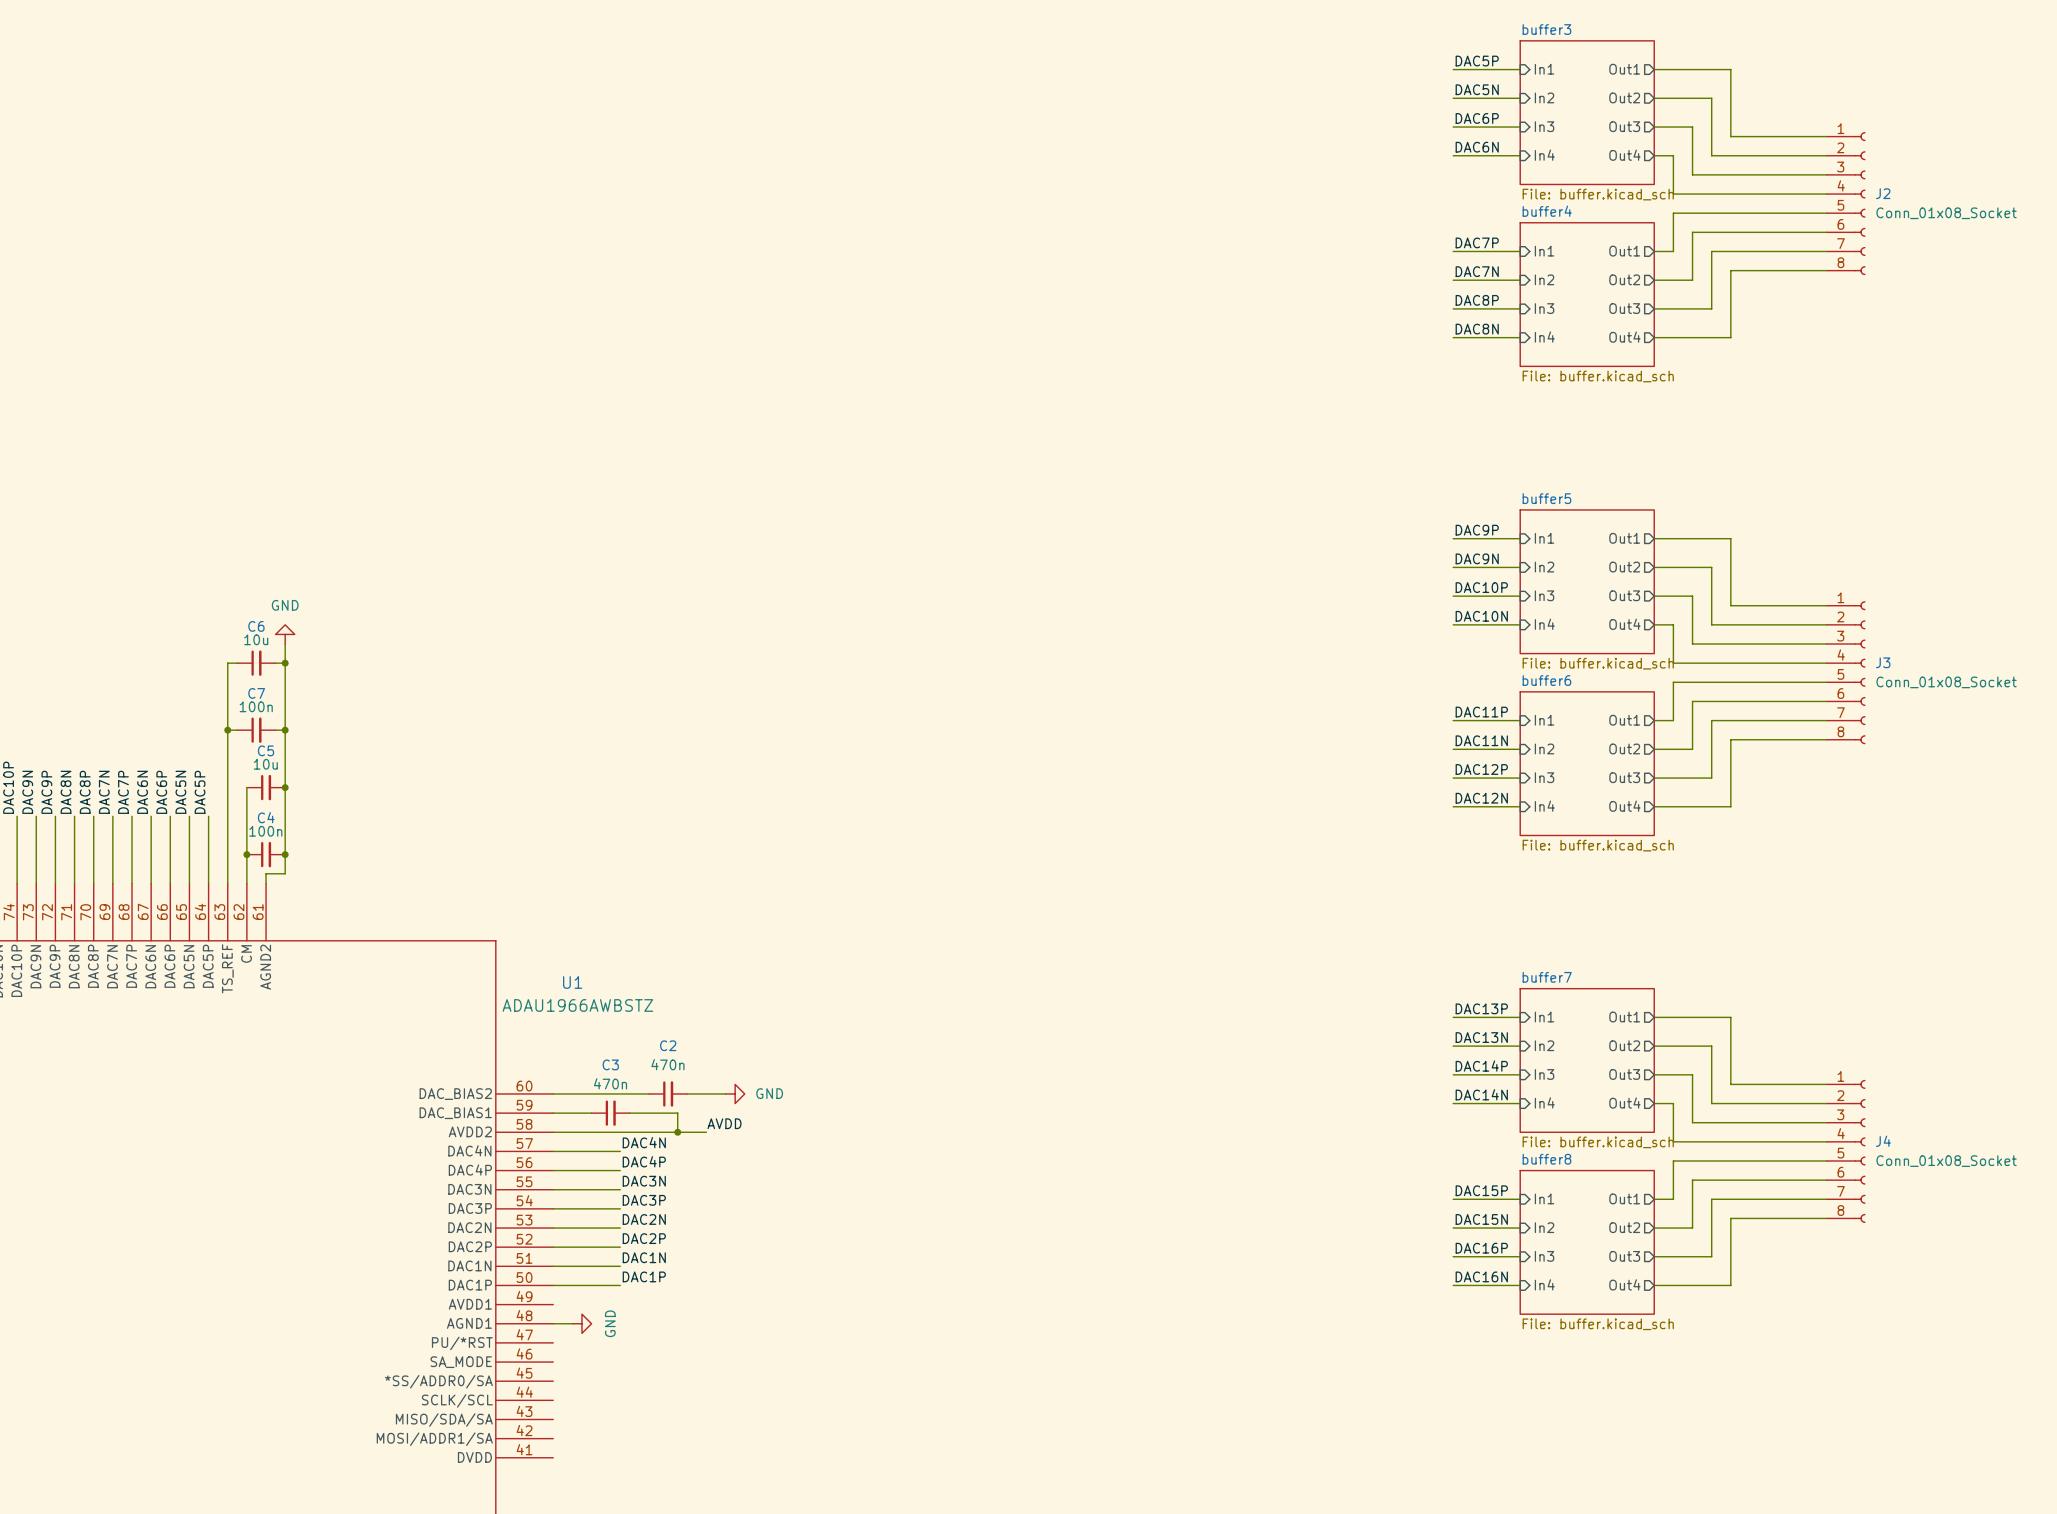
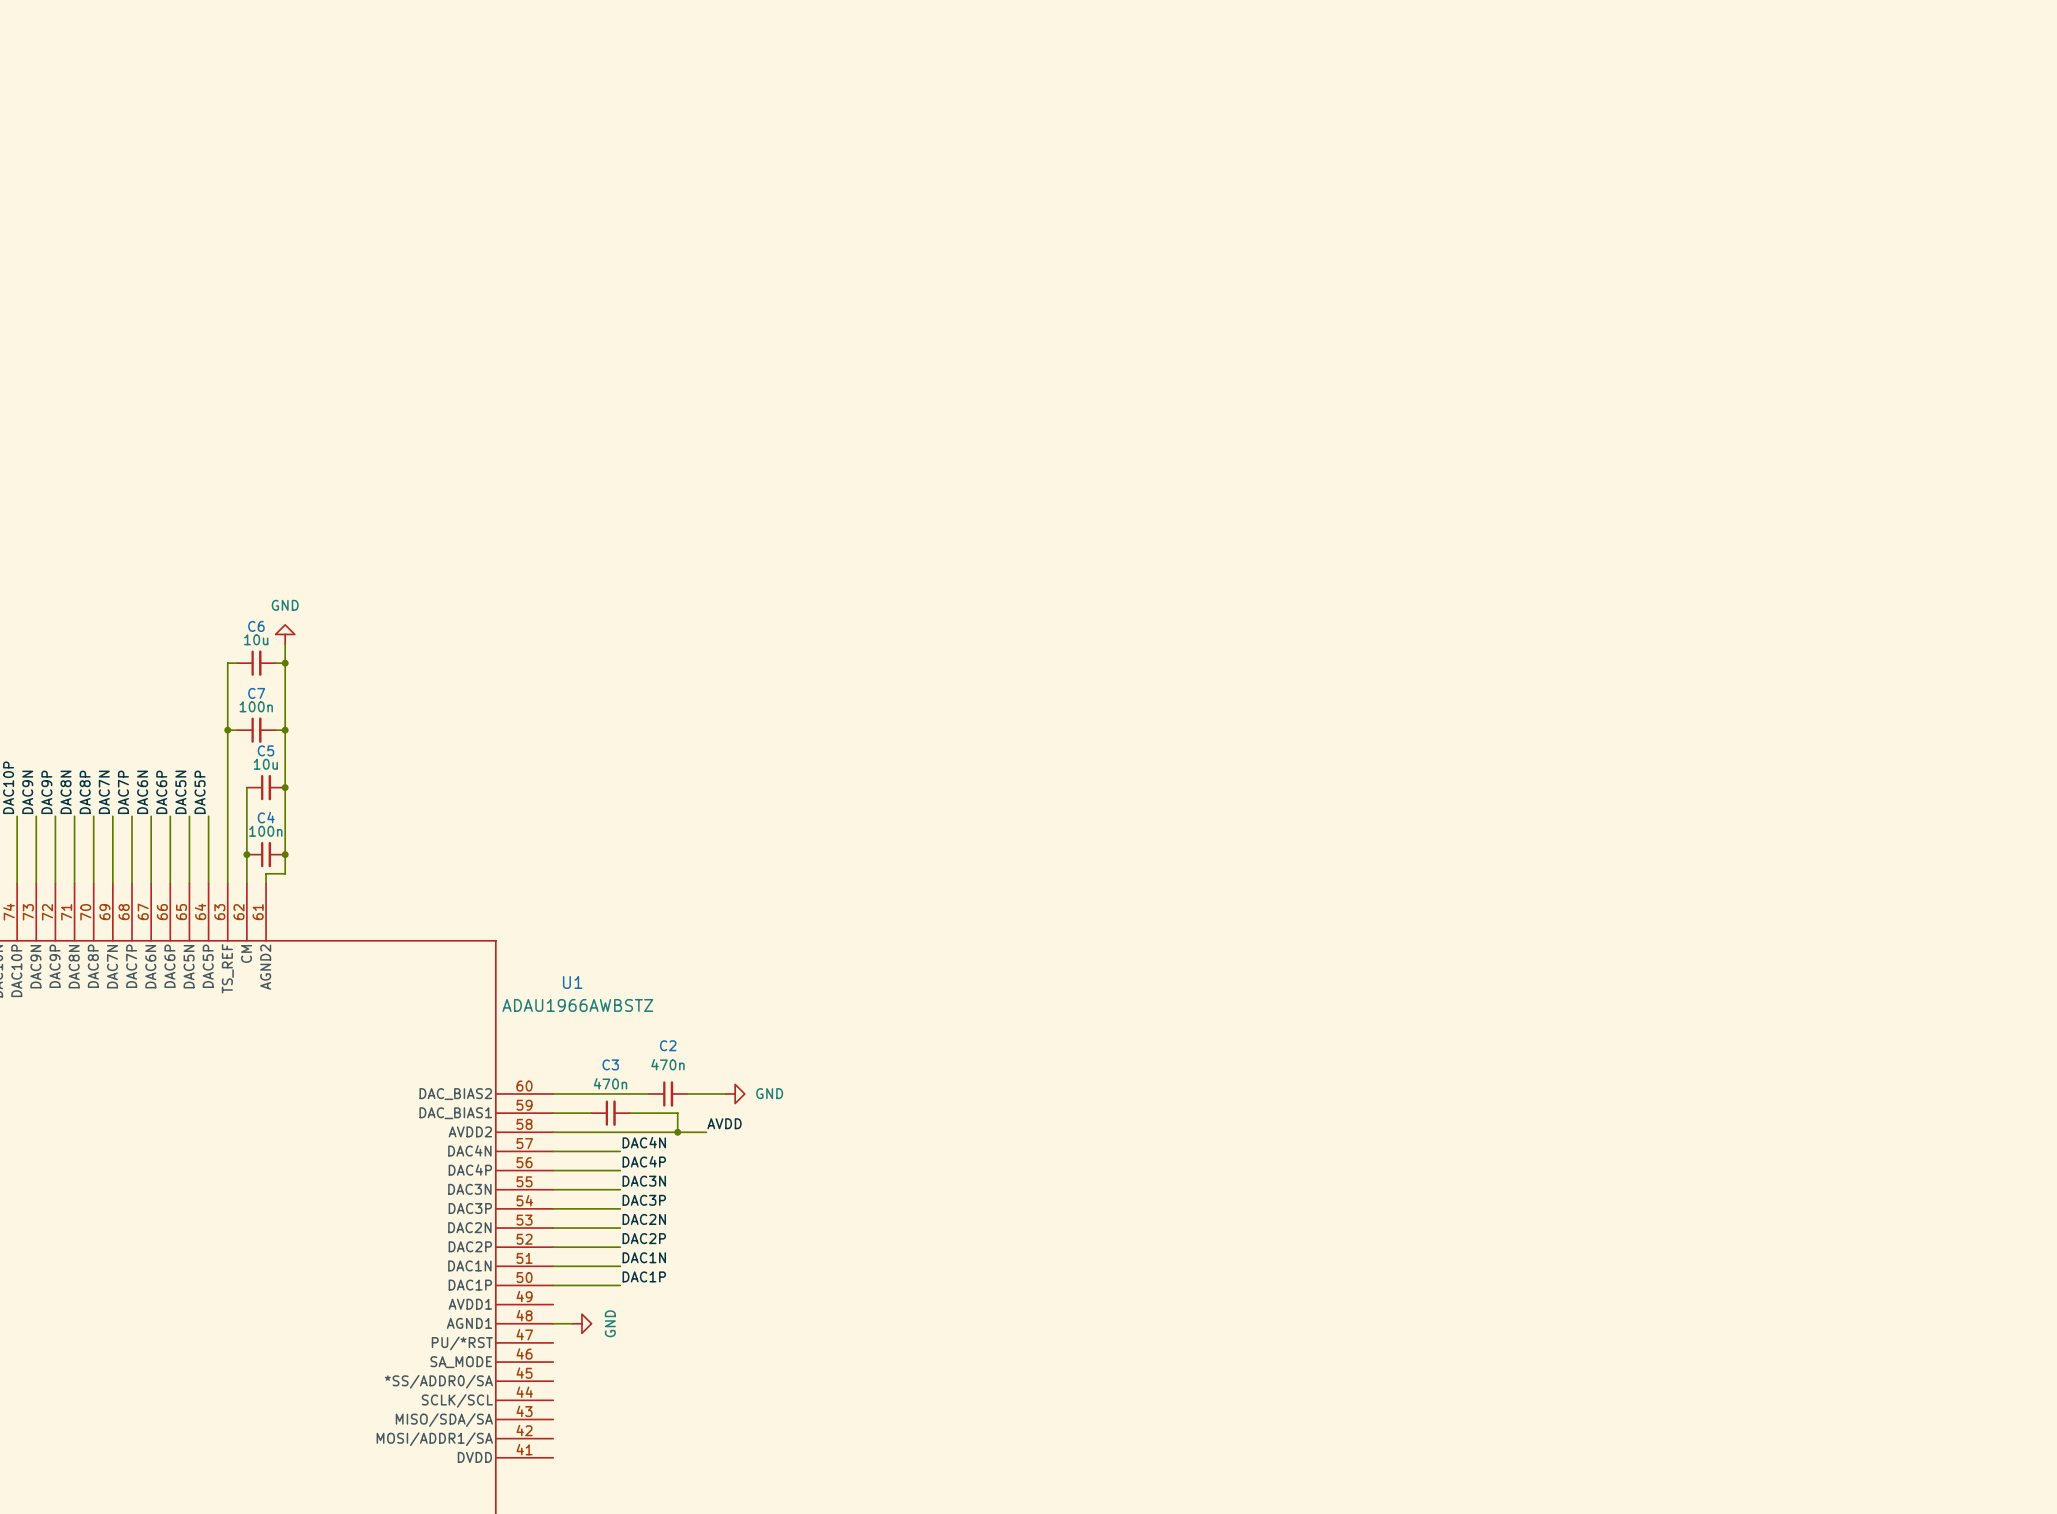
label: DAC5P (1477, 61) -> none
wire: (1453, 69) (1520, 69) -> none
sheet pin: In1 (1544, 69) -> none
sheet pin: Out1 (1624, 69) -> none
wire: (1654, 69) (1730, 69) (1730, 136) (1826, 136) -> none
label: DAC5N (1477, 89) -> none
sheet pin: In2 (1544, 97) -> none
sheet pin: Out2 (1624, 97) -> none
wire: (1453, 98) (1520, 98) -> none
wire: (1654, 98) (1711, 98) (1711, 155) (1826, 155) -> none
sheet buffer3: File: buffer.kicad_sch (1587, 112) -> none
label: DAC6P (1477, 118) -> none
sheet pin: In3 (1544, 126) -> none
sheet pin: Out3 (1624, 126) -> none
wire: (1453, 127) (1520, 127) -> none
wire: (1654, 127) (1692, 127) (1692, 174) (1826, 174) -> none
label: DAC6N (1477, 147) -> none
wire: (1453, 155) (1520, 155) -> none
sheet pin: In4 (1544, 155) -> none
sheet pin: Out4 (1624, 155) -> none
wire: (1654, 155) (1673, 155) (1673, 194) (1826, 194) -> none
J2: Conn_01x08_Socket (1846, 203) -> none
wire: (1826, 213) (1673, 213) (1673, 251) (1654, 251) -> none
wire: (1826, 232) (1692, 232) (1692, 280) (1654, 280) -> none
label: DAC7P (1477, 242) -> none
wire: (1453, 251) (1520, 251) -> none
sheet pin: In1 (1544, 251) -> none
sheet pin: Out1 (1624, 251) -> none
wire: (1826, 251) (1711, 251) (1711, 308) (1654, 308) -> none
wire: (1826, 270) (1730, 270) (1730, 337) (1654, 337) -> none
label: DAC7N (1477, 271) -> none
sheet pin: In2 (1544, 279) -> none
sheet pin: Out2 (1624, 279) -> none
wire: (1453, 280) (1520, 280) -> none
sheet buffer4: File: buffer.kicad_sch (1587, 294) -> none
label: DAC8P (1477, 300) -> none
wire: (1453, 308) (1520, 308) -> none
sheet pin: In3 (1544, 308) -> none
sheet pin: Out3 (1624, 308) -> none
label: DAC8N (1477, 329) -> none
wire: (1453, 337) (1520, 337) -> none
sheet pin: In4 (1544, 337) -> none
sheet pin: Out4 (1624, 337) -> none
label: DAC9P (1477, 530) -> none
wire: (1453, 538) (1520, 538) -> none
sheet pin: In1 (1544, 538) -> none
sheet pin: Out1 (1624, 538) -> none
wire: (1654, 538) (1730, 538) (1730, 605) (1826, 605) -> none
label: DAC9N (1477, 558) -> none
wire: (1453, 567) (1520, 567) -> none
sheet pin: In2 (1544, 567) -> none
sheet pin: Out2 (1624, 567) -> none
wire: (1654, 567) (1711, 567) (1711, 624) (1826, 624) -> none
sheet buffer5: File: buffer.kicad_sch (1587, 581) -> none
label: DAC10P (1481, 587) -> none
sheet pin: In3 (1544, 595) -> none
sheet pin: Out3 (1624, 595) -> none
wire: (1453, 596) (1520, 596) -> none
wire: (1654, 596) (1692, 596) (1692, 644) (1826, 644) -> none
label: DAC10N (1481, 616) -> none
wire: (1453, 624) (1520, 624) -> none
sheet pin: In4 (1544, 624) -> none
sheet pin: Out4 (1624, 624) -> none
wire: (1654, 624) (1673, 624) (1673, 663) (1826, 663) -> none
J3: Conn_01x08_Socket (1846, 672) -> none
wire: (1826, 682) (1673, 682) (1673, 720) (1654, 720) -> none
wire: (1826, 701) (1692, 701) (1692, 749) (1654, 749) -> none
label: DAC11P (1481, 712) -> none
wire: (1453, 720) (1520, 720) -> none
sheet pin: In1 (1544, 720) -> none
sheet pin: Out1 (1624, 720) -> none
wire: (1826, 720) (1711, 720) (1711, 778) (1654, 778) -> none
wire: (1826, 739) (1730, 739) (1730, 806) (1654, 806) -> none
label: DAC11N (1481, 740) -> none
sheet pin: In2 (1544, 748) -> none
sheet pin: Out2 (1624, 748) -> none
wire: (1453, 749) (1520, 749) -> none
sheet buffer6: File: buffer.kicad_sch (1587, 763) -> none
label: DAC12P (1481, 769) -> none
sheet pin: In3 (1544, 777) -> none
sheet pin: Out3 (1624, 777) -> none
wire: (1453, 778) (1520, 778) -> none
label: DAC12N (1481, 798) -> none
wire: (1453, 806) (1520, 806) -> none
sheet pin: In4 (1544, 806) -> none
sheet pin: Out4 (1624, 806) -> none
label: DAC13P (1481, 1008) -> none
wire: (1453, 1017) (1520, 1017) -> none
sheet pin: In1 (1544, 1017) -> none
sheet pin: Out1 (1624, 1017) -> none
wire: (1654, 1017) (1730, 1017) (1730, 1084) (1826, 1084) -> none
label: DAC13N (1481, 1037) -> none
sheet pin: In2 (1544, 1045) -> none
sheet pin: Out2 (1624, 1045) -> none
wire: (1453, 1046) (1520, 1046) -> none
wire: (1654, 1046) (1711, 1046) (1711, 1103) (1826, 1103) -> none
sheet buffer7: File: buffer.kicad_sch (1587, 1060) -> none
label: DAC14P (1481, 1066) -> none
wire: (1453, 1074) (1520, 1074) -> none
sheet pin: In3 (1544, 1074) -> none
sheet pin: Out3 (1624, 1074) -> none
wire: (1654, 1074) (1692, 1074) (1692, 1122) (1826, 1122) -> none
label: DAC14N (1481, 1094) -> none
sheet pin: In4 (1544, 1102) -> none
sheet pin: Out4 (1624, 1102) -> none
wire: (1453, 1103) (1520, 1103) -> none
wire: (1654, 1103) (1673, 1103) (1673, 1141) (1826, 1141) -> none
J4: Conn_01x08_Socket (1846, 1151) -> none
wire: (1826, 1160) (1673, 1160) (1673, 1199) (1654, 1199) -> none
wire: (1826, 1180) (1692, 1180) (1692, 1228) (1654, 1228) -> none
label: DAC15P (1481, 1190) -> none
sheet pin: In1 (1544, 1198) -> none
sheet pin: Out1 (1624, 1198) -> none
wire: (1453, 1199) (1520, 1199) -> none
wire: (1826, 1199) (1711, 1199) (1711, 1256) (1654, 1256) -> none
wire: (1826, 1218) (1730, 1218) (1730, 1285) (1654, 1285) -> none
label: DAC15N (1481, 1219) -> none
sheet pin: In2 (1544, 1227) -> none
sheet pin: Out2 (1624, 1227) -> none
wire: (1453, 1228) (1520, 1228) -> none
sheet buffer8: File: buffer.kicad_sch (1587, 1242) -> none
label: DAC16P (1481, 1248) -> none
wire: (1453, 1256) (1520, 1256) -> none
sheet pin: In3 (1544, 1256) -> none
sheet pin: Out3 (1624, 1256) -> none
label: DAC16N (1481, 1276) -> none
sheet pin: In4 (1544, 1284) -> none
sheet pin: Out4 (1624, 1284) -> none
wire: (1453, 1285) (1520, 1285) -> none

